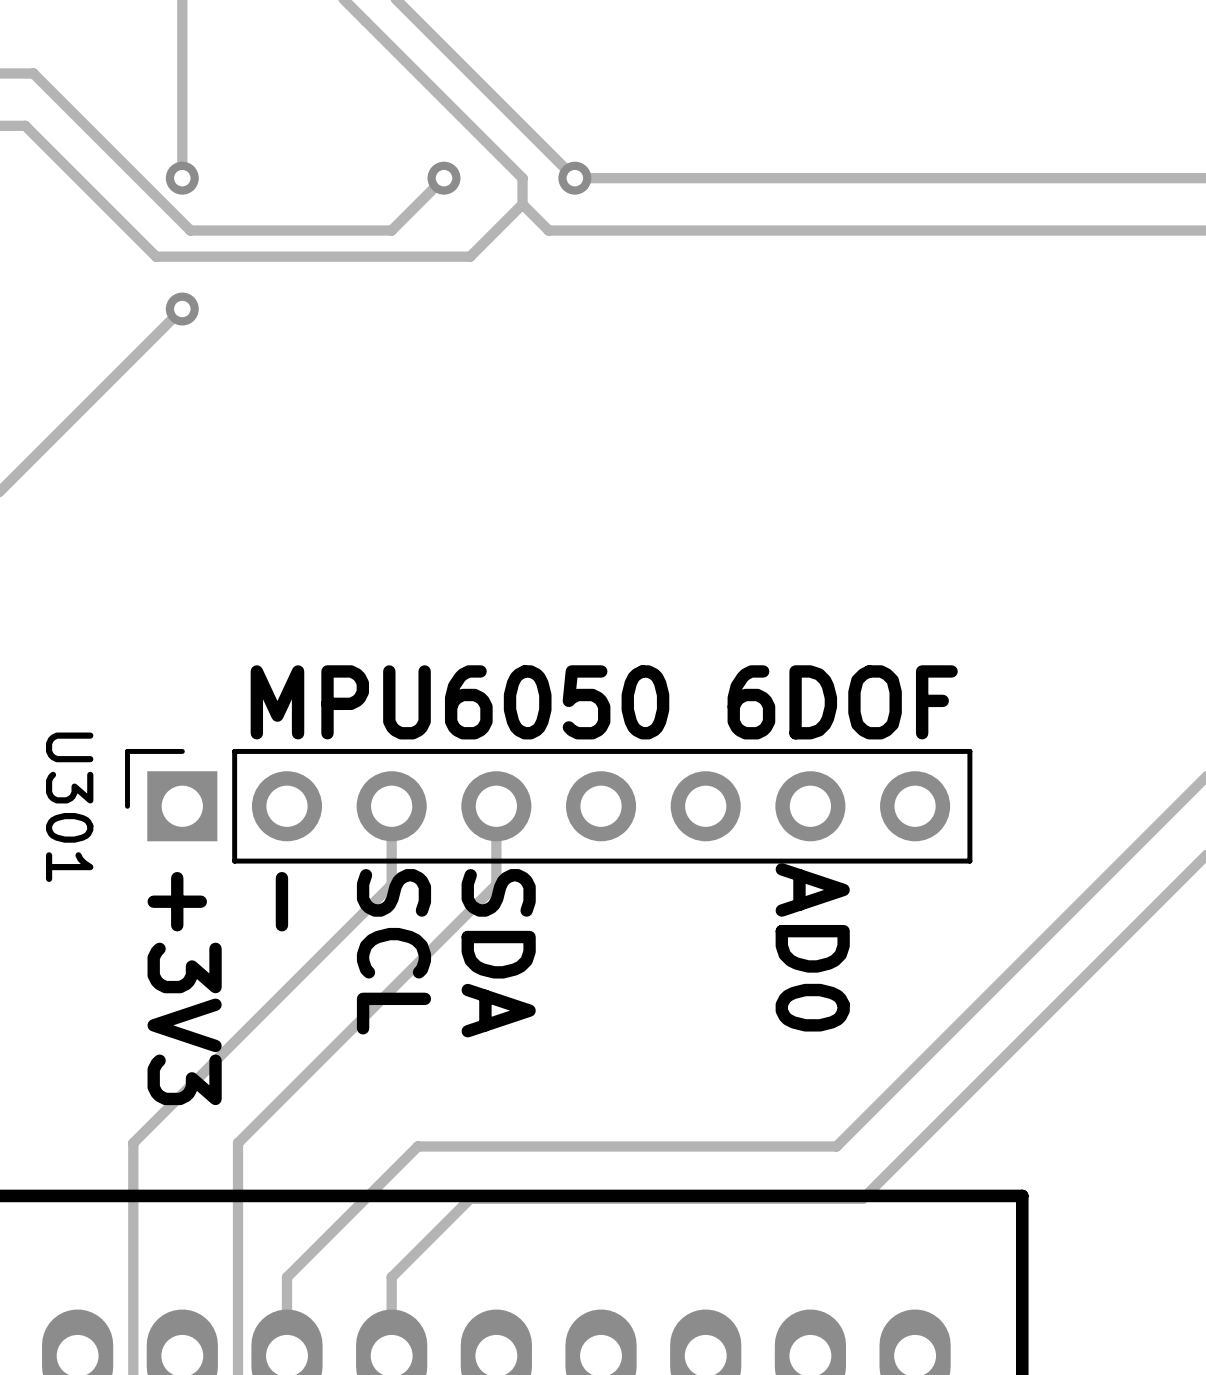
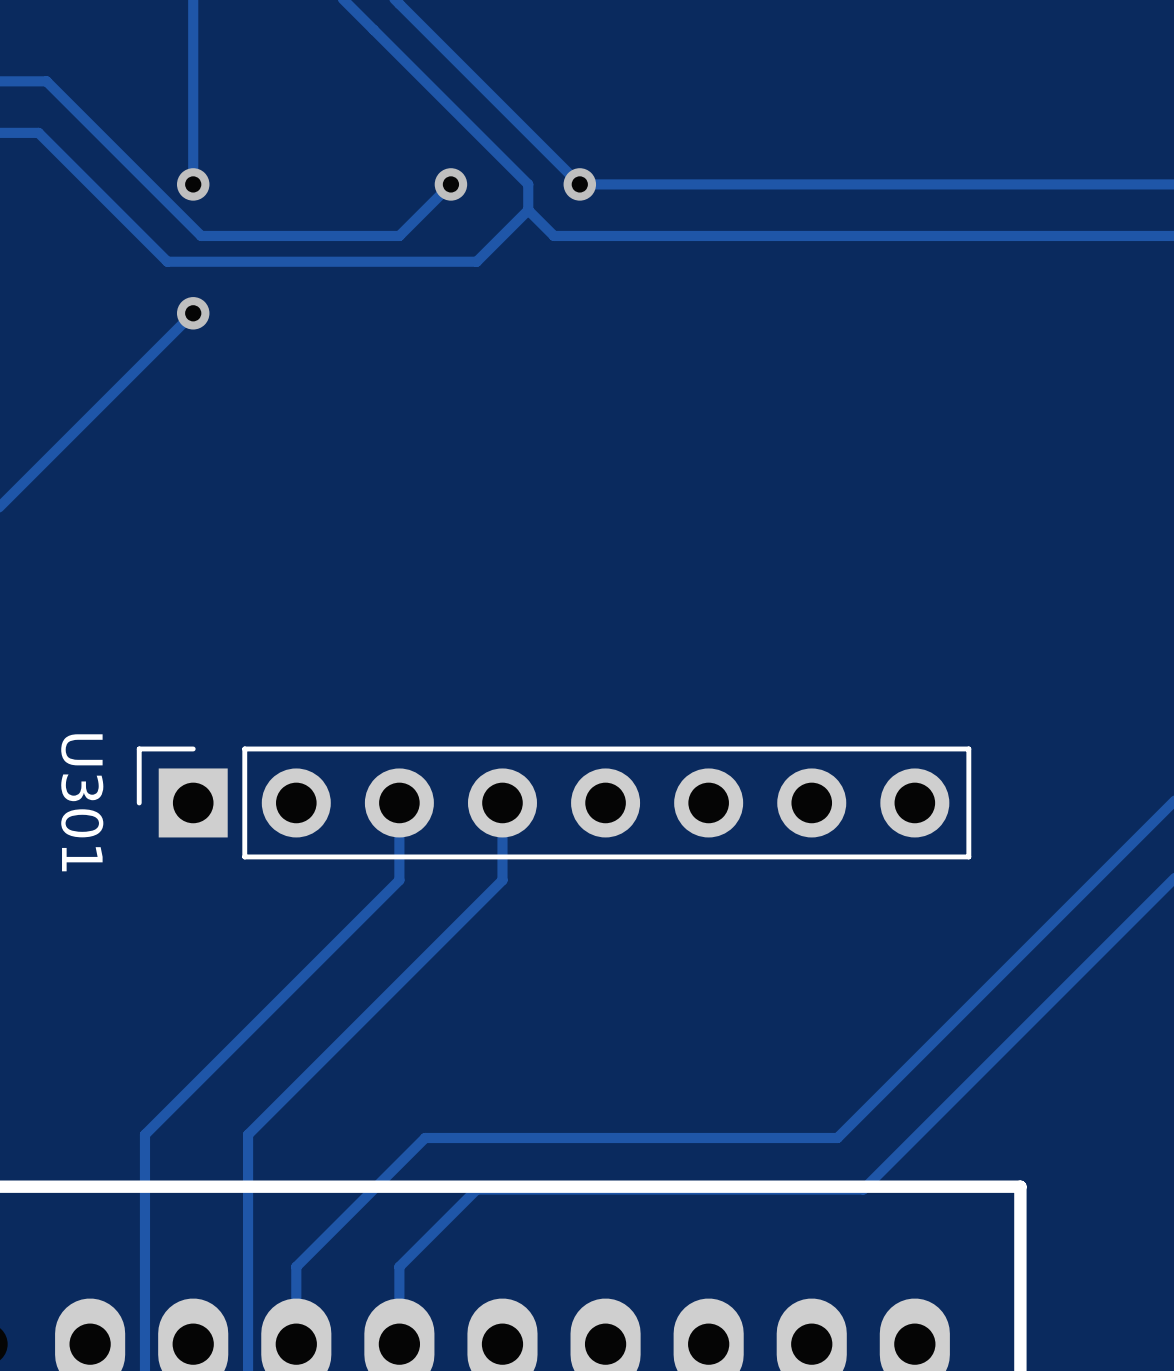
text: MPU6050 6DOF (604, 702) -> none
text: - (281, 901) -> none
text: AD0 (812, 947) -> none
text: SCL (393, 951) -> none
text: SDA (498, 953) -> none
text: +3V3 (184, 988) -> none

